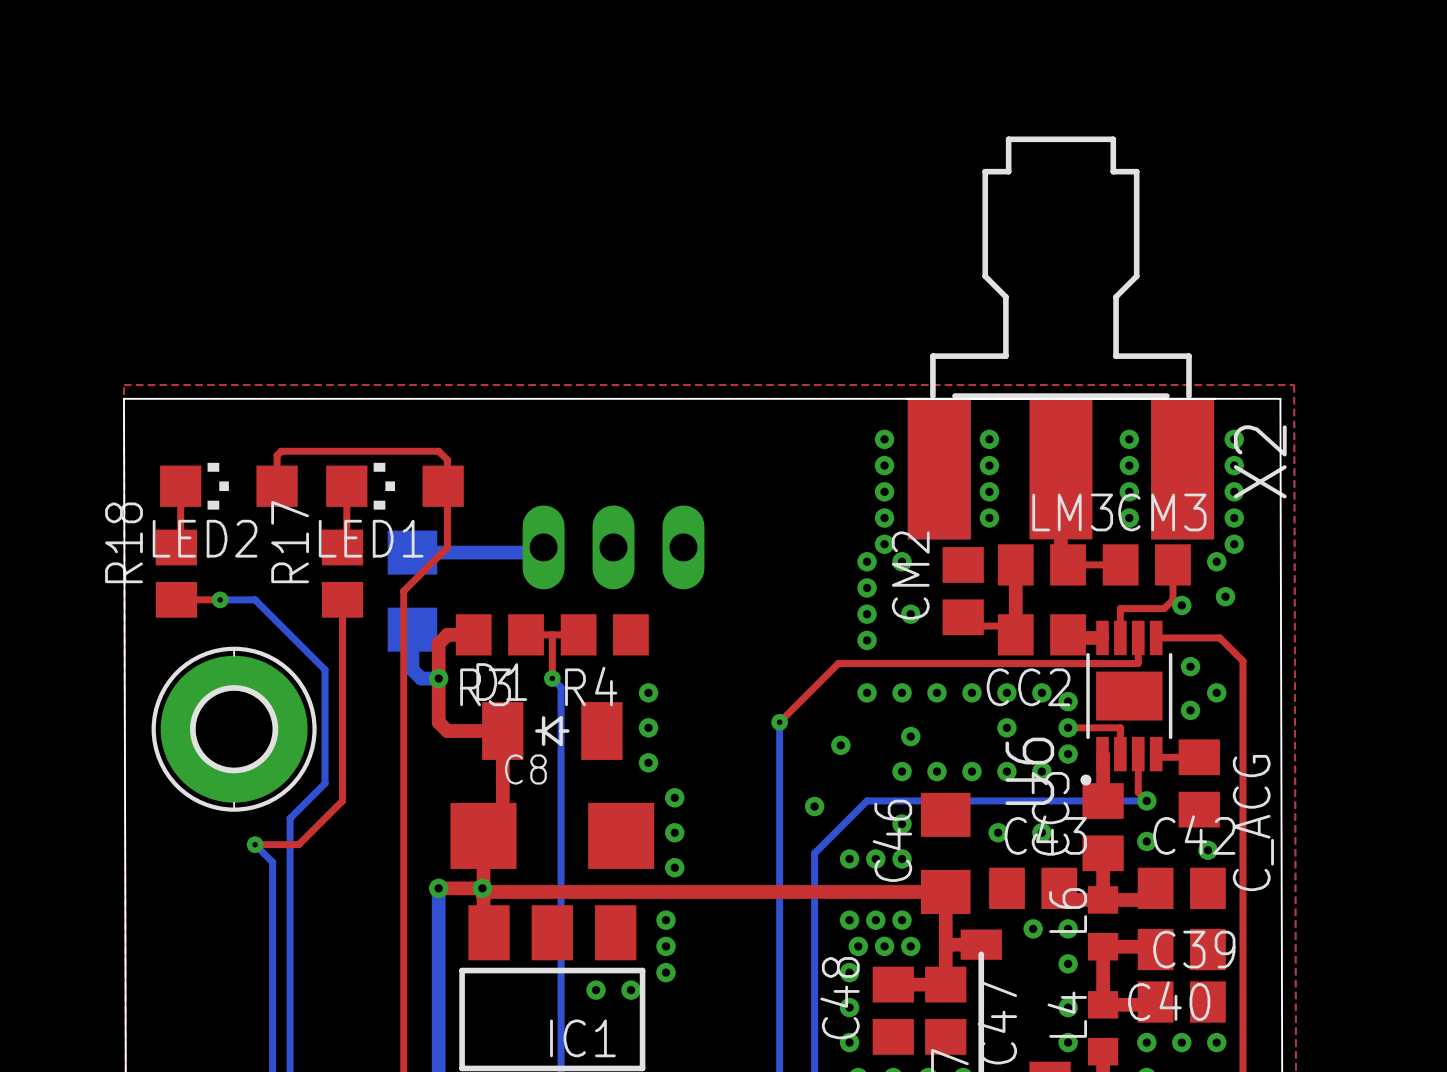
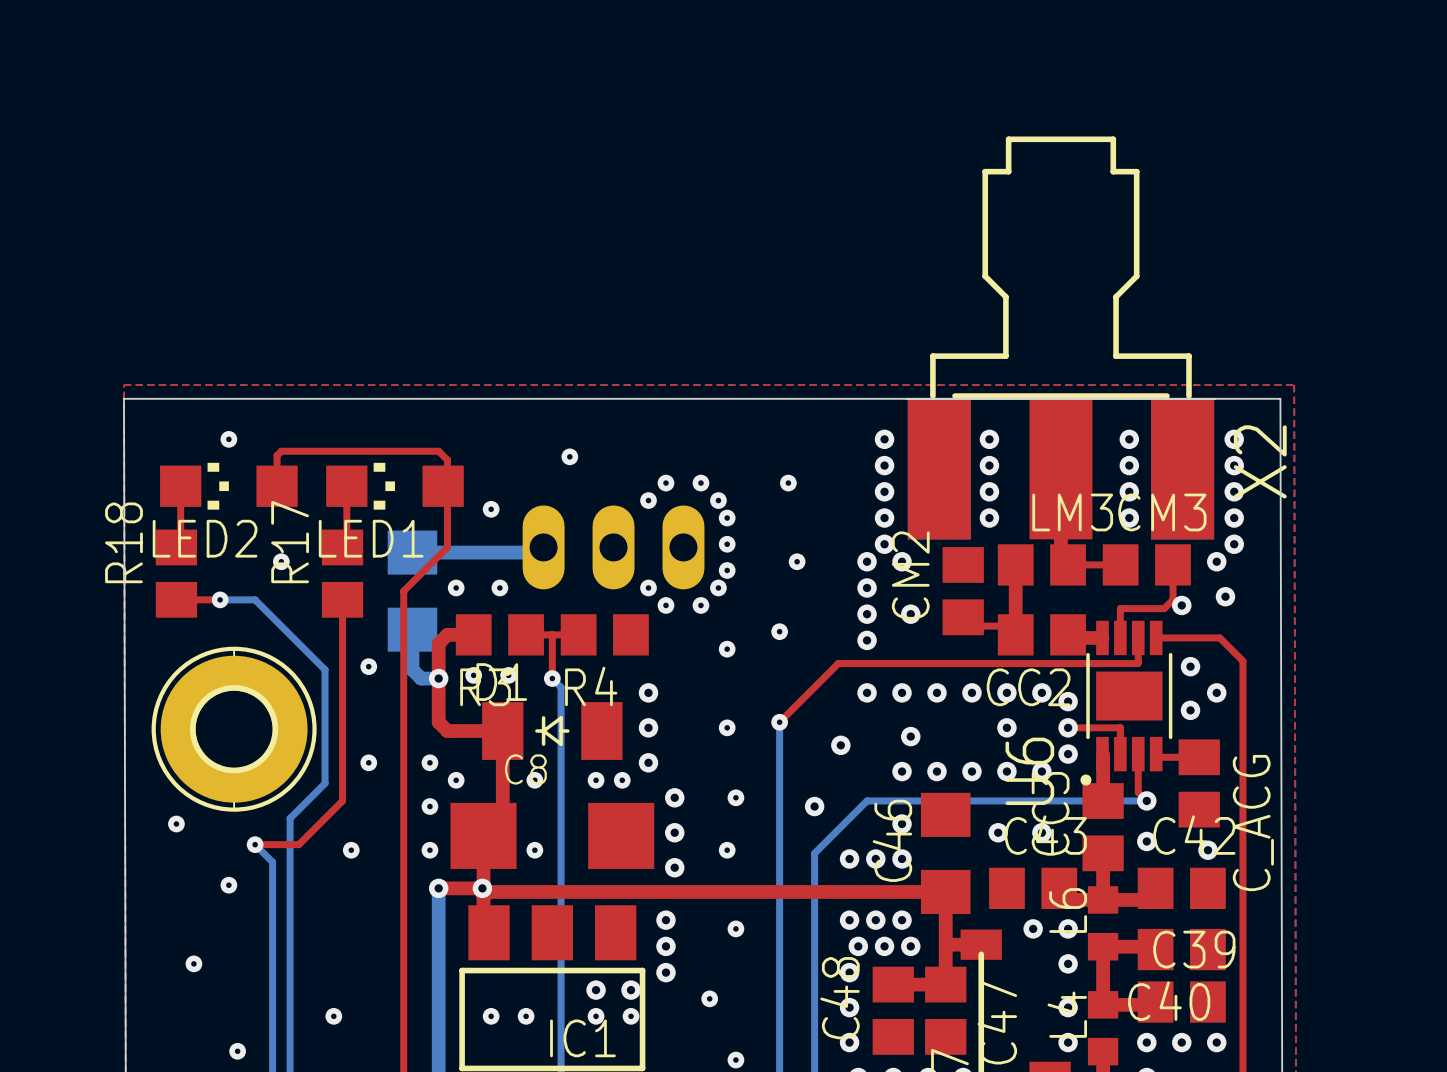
via: none -> (228, 439)
via: none -> (569, 456)
via: none -> (665, 483)
via: none -> (700, 483)
via: none -> (788, 483)
via: none -> (648, 500)
via: none -> (718, 500)
via: none -> (491, 509)
via: none -> (727, 518)
via: none -> (727, 544)
via: none -> (281, 561)
via: none -> (797, 561)
via: none -> (727, 570)
via: none -> (456, 587)
via: none -> (499, 587)
via: none -> (648, 587)
via: none -> (718, 587)
via: none -> (665, 605)
via: none -> (700, 605)
via: none -> (779, 631)
via: none -> (727, 649)
via: none -> (368, 666)
via: none -> (473, 675)
via: none -> (508, 675)
via: none -> (727, 727)
via: none -> (368, 762)
via: none -> (429, 762)
via: none -> (456, 780)
via: none -> (534, 780)
via: none -> (596, 780)
via: none -> (622, 780)
via: none -> (735, 797)
via: none -> (429, 806)
via: none -> (176, 824)
via: none -> (351, 850)
via: none -> (429, 850)
via: none -> (534, 850)
via: none -> (727, 850)
via: none -> (228, 885)
via: none -> (735, 928)
via: none -> (193, 963)
via: none -> (709, 998)
via: none -> (333, 1016)
via: none -> (491, 1016)
via: none -> (526, 1016)
via: none -> (596, 1016)
via: none -> (631, 1016)
via: none -> (237, 1051)
via: none -> (735, 1060)

